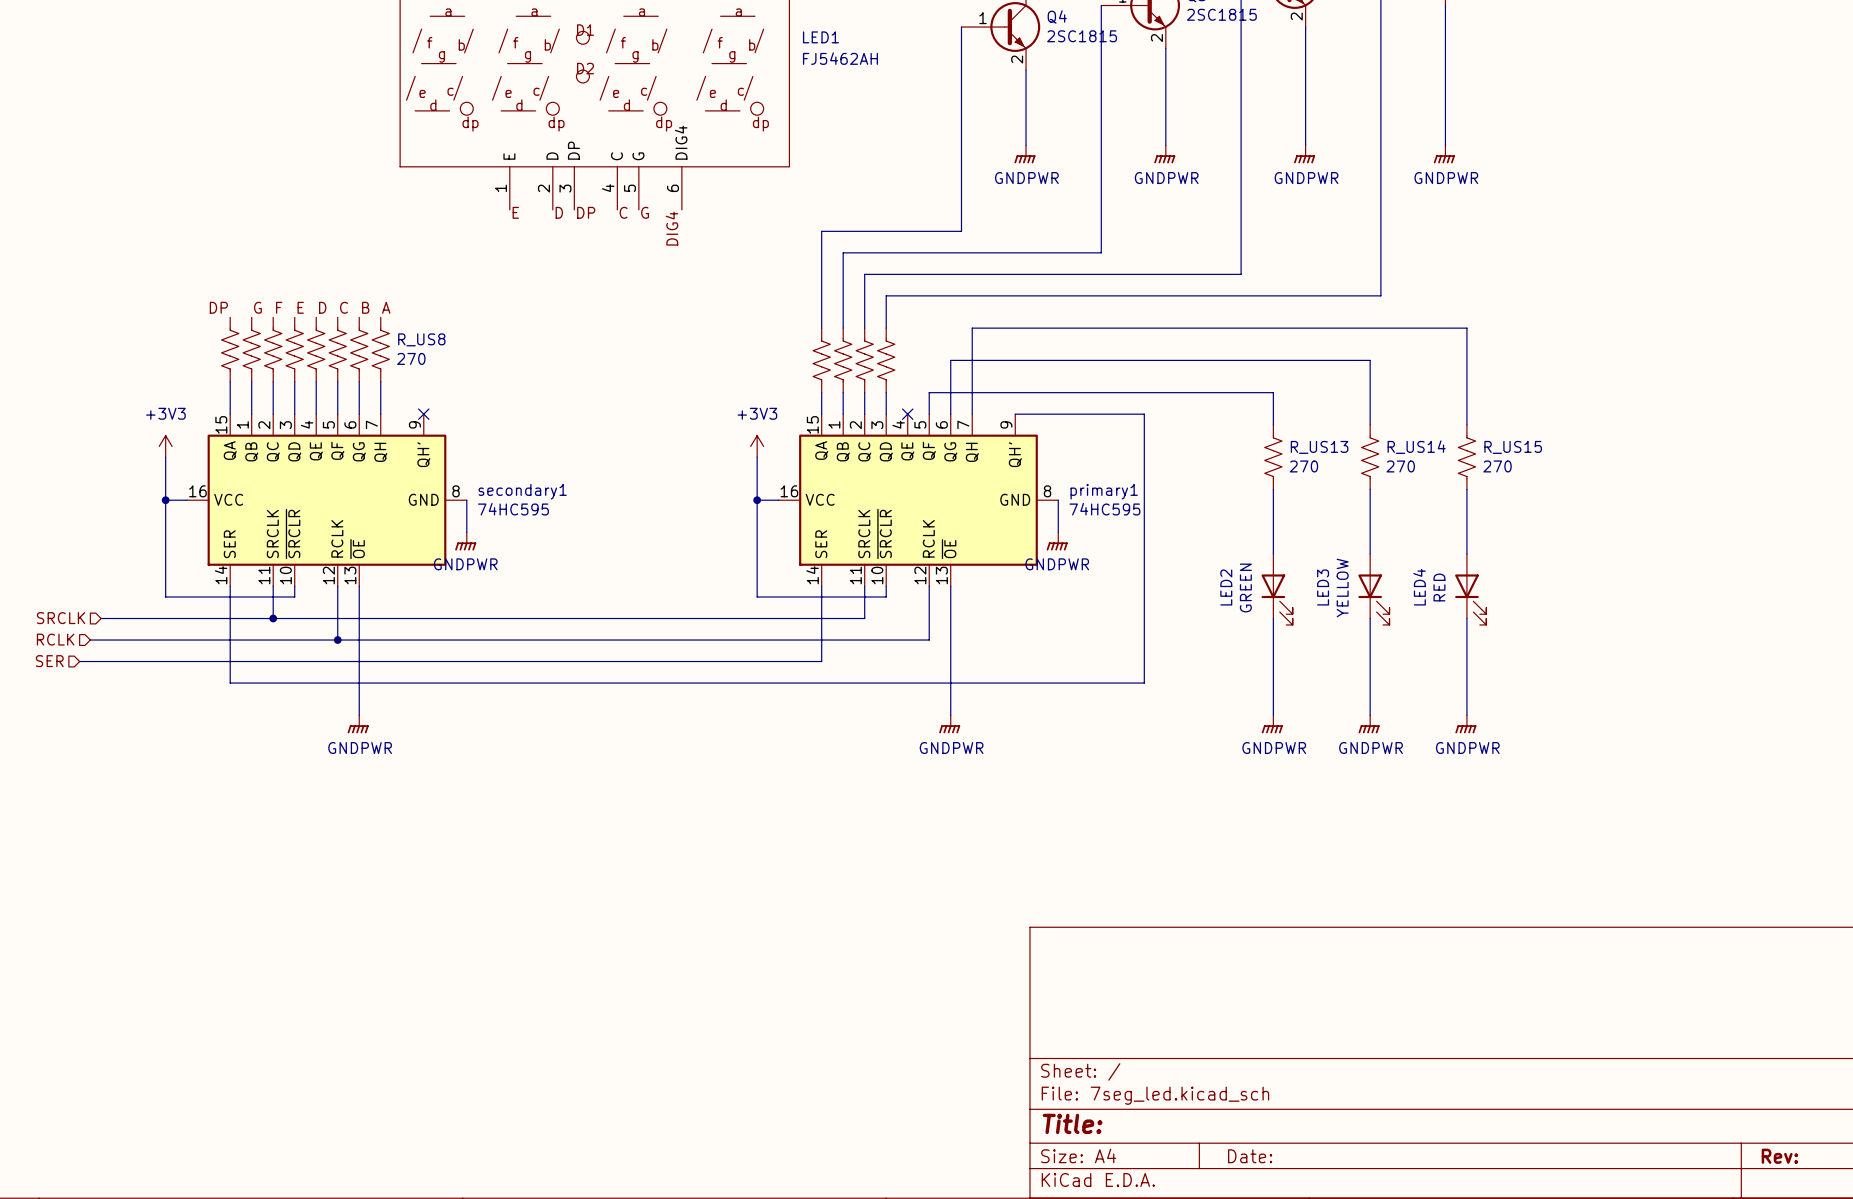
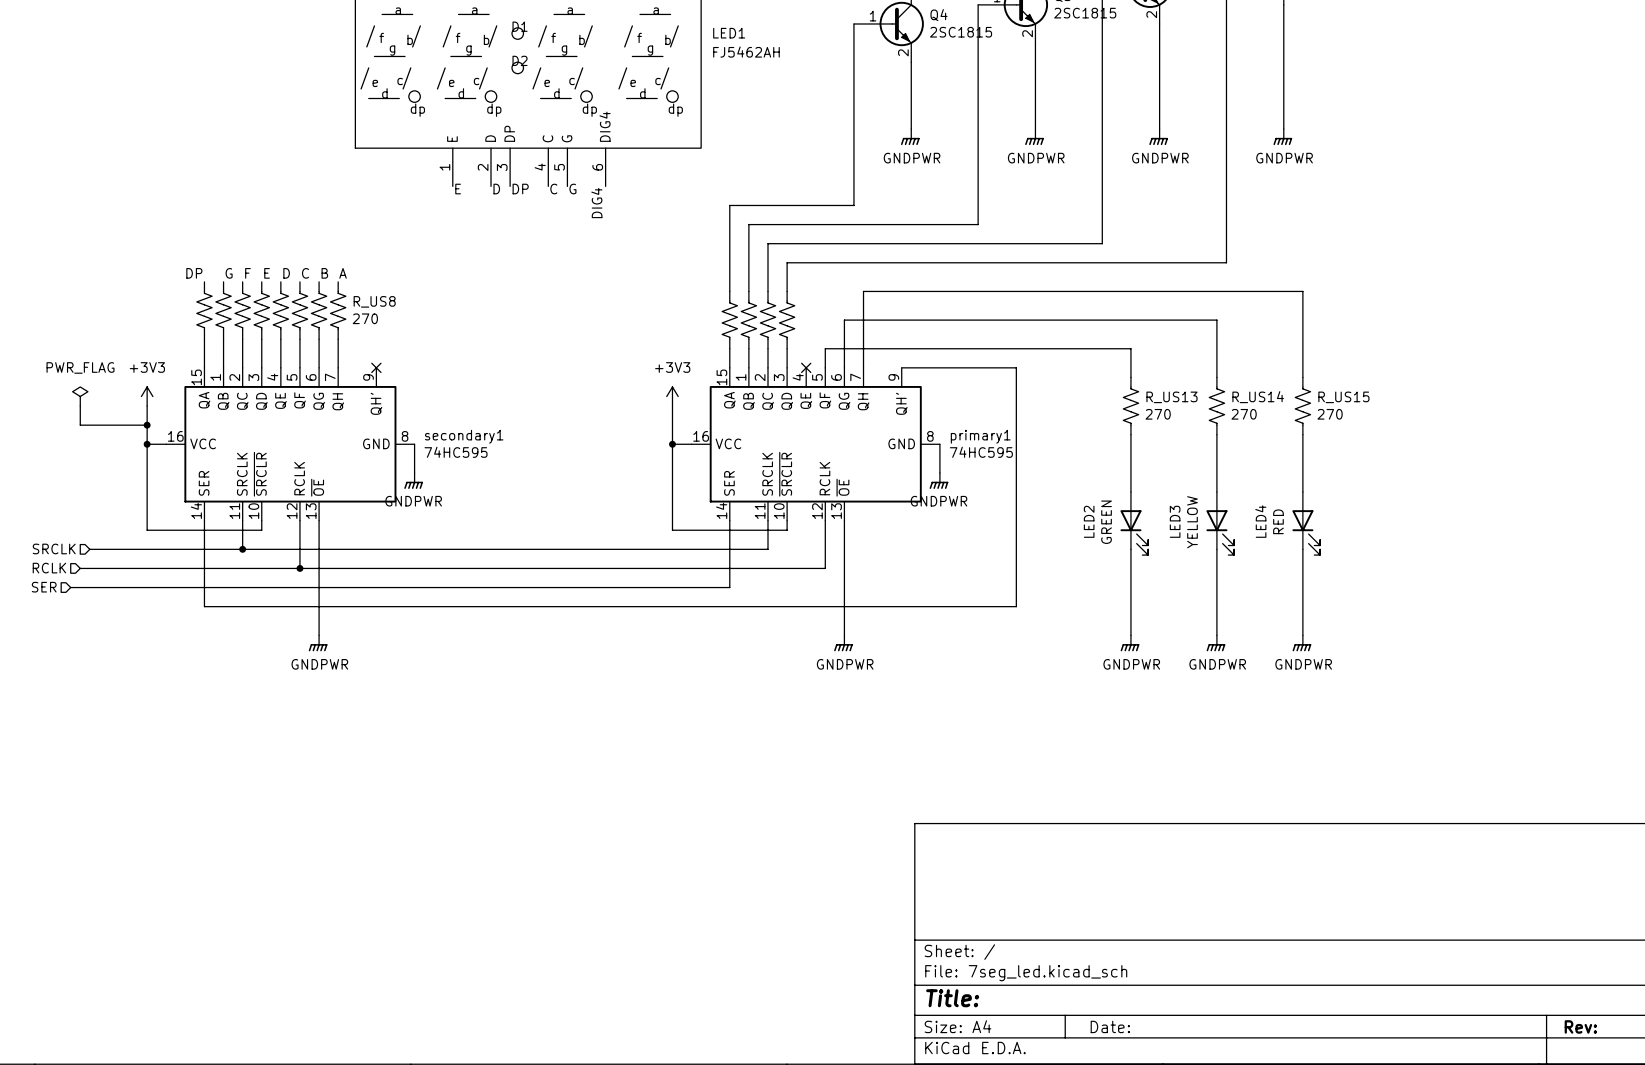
power symbol: none -> PWR_FLAG (80, 396)
wire: none -> (80, 406) (80, 425) (147, 425)
junction: none -> (147, 425)

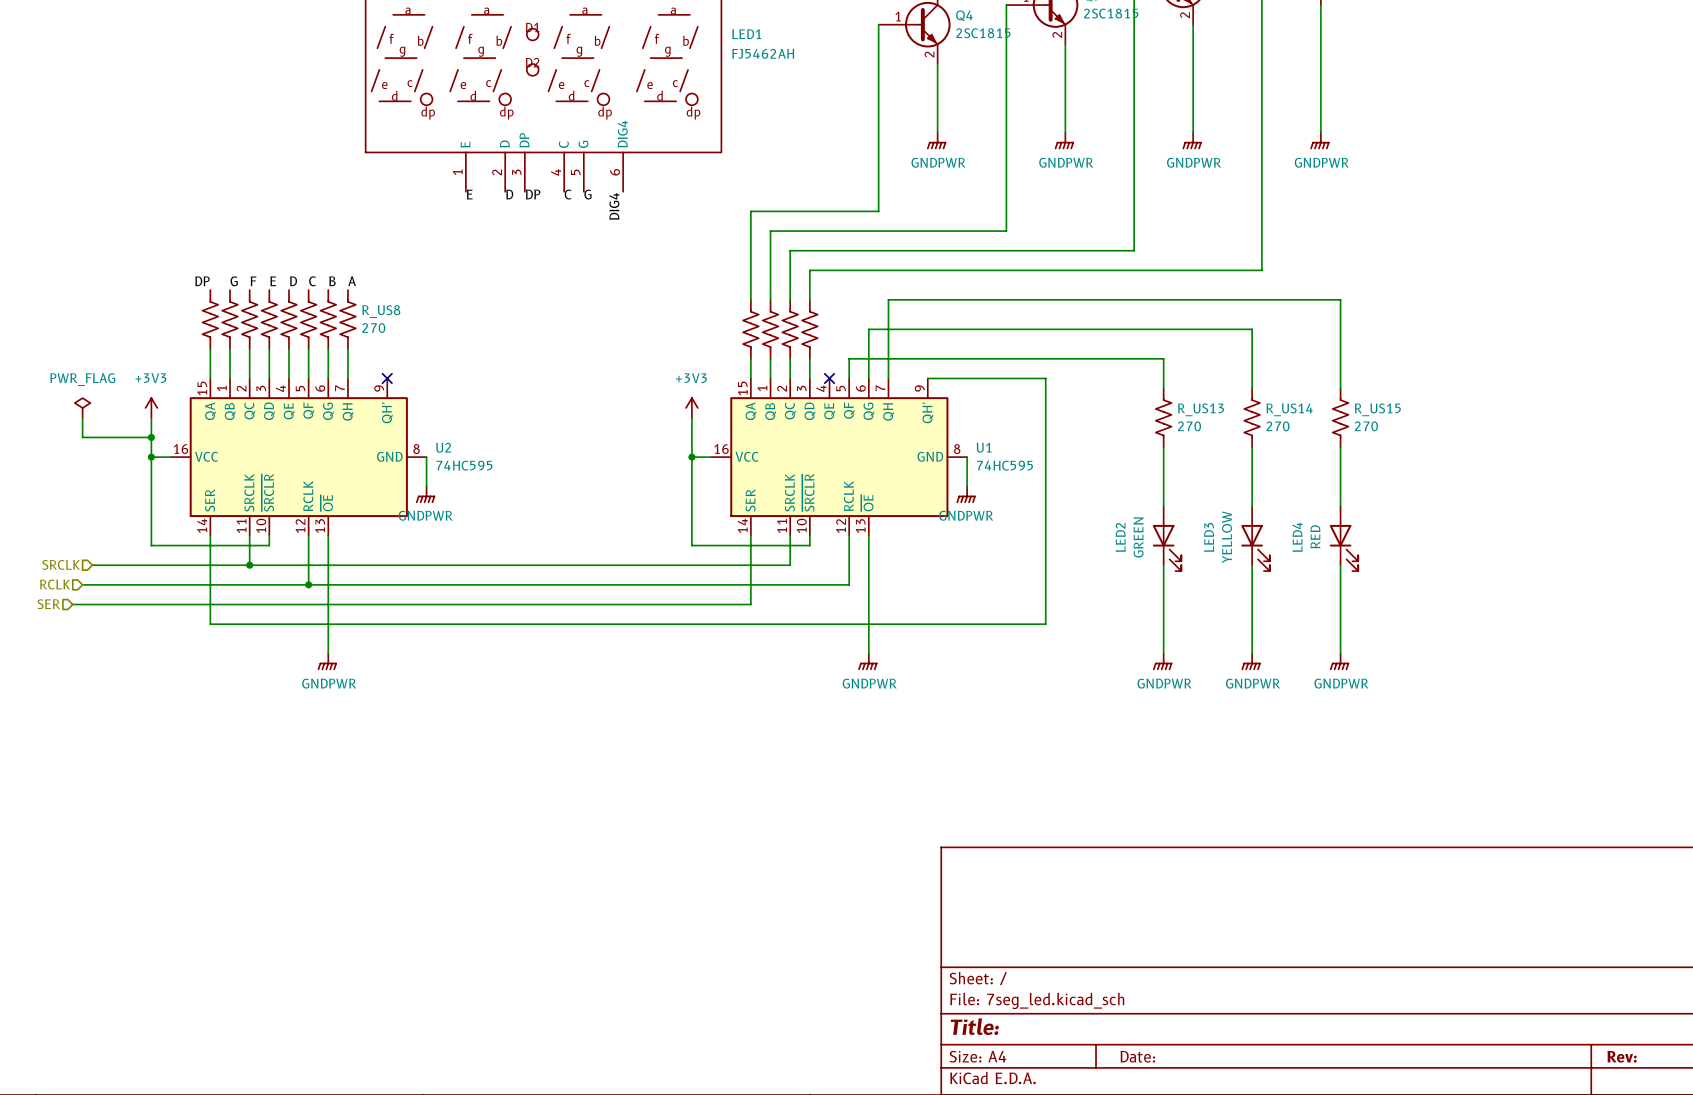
secondary1 name: secondary1 (464, 436) -> U2 (443, 447)
primary1 name: primary1 (980, 436) -> U1 (984, 447)

